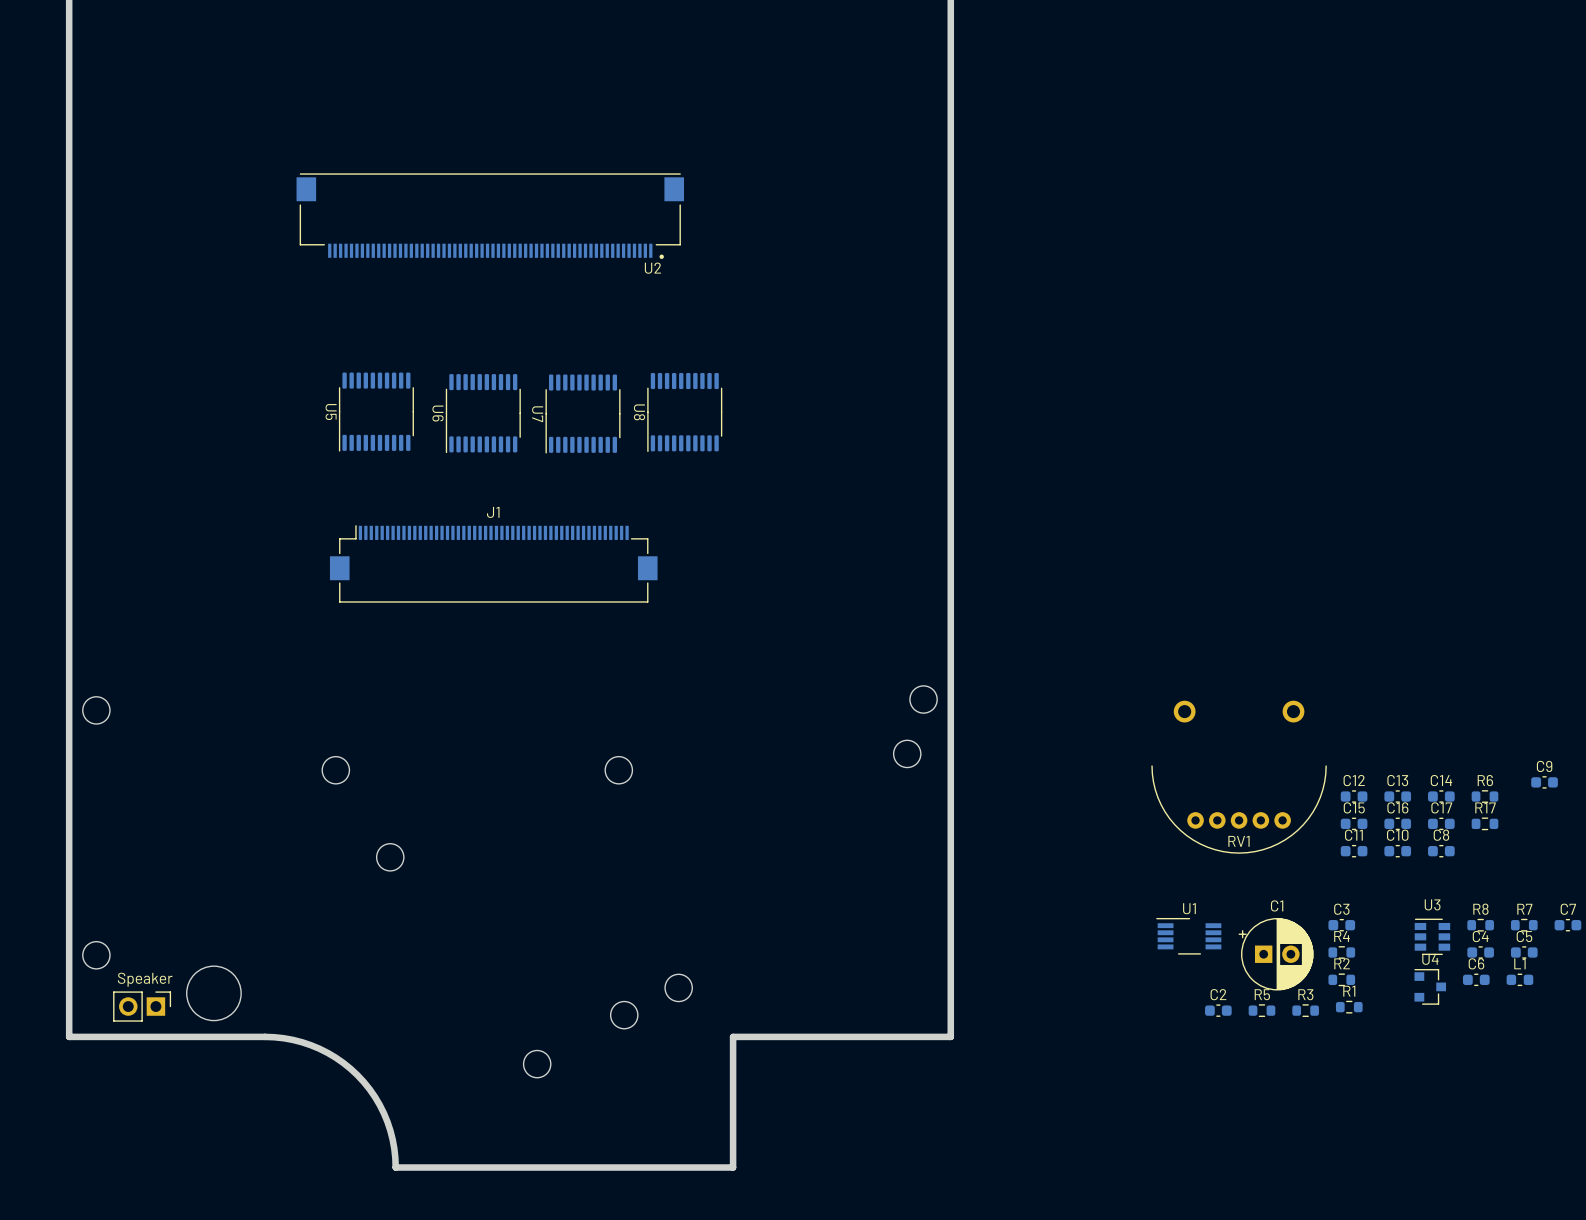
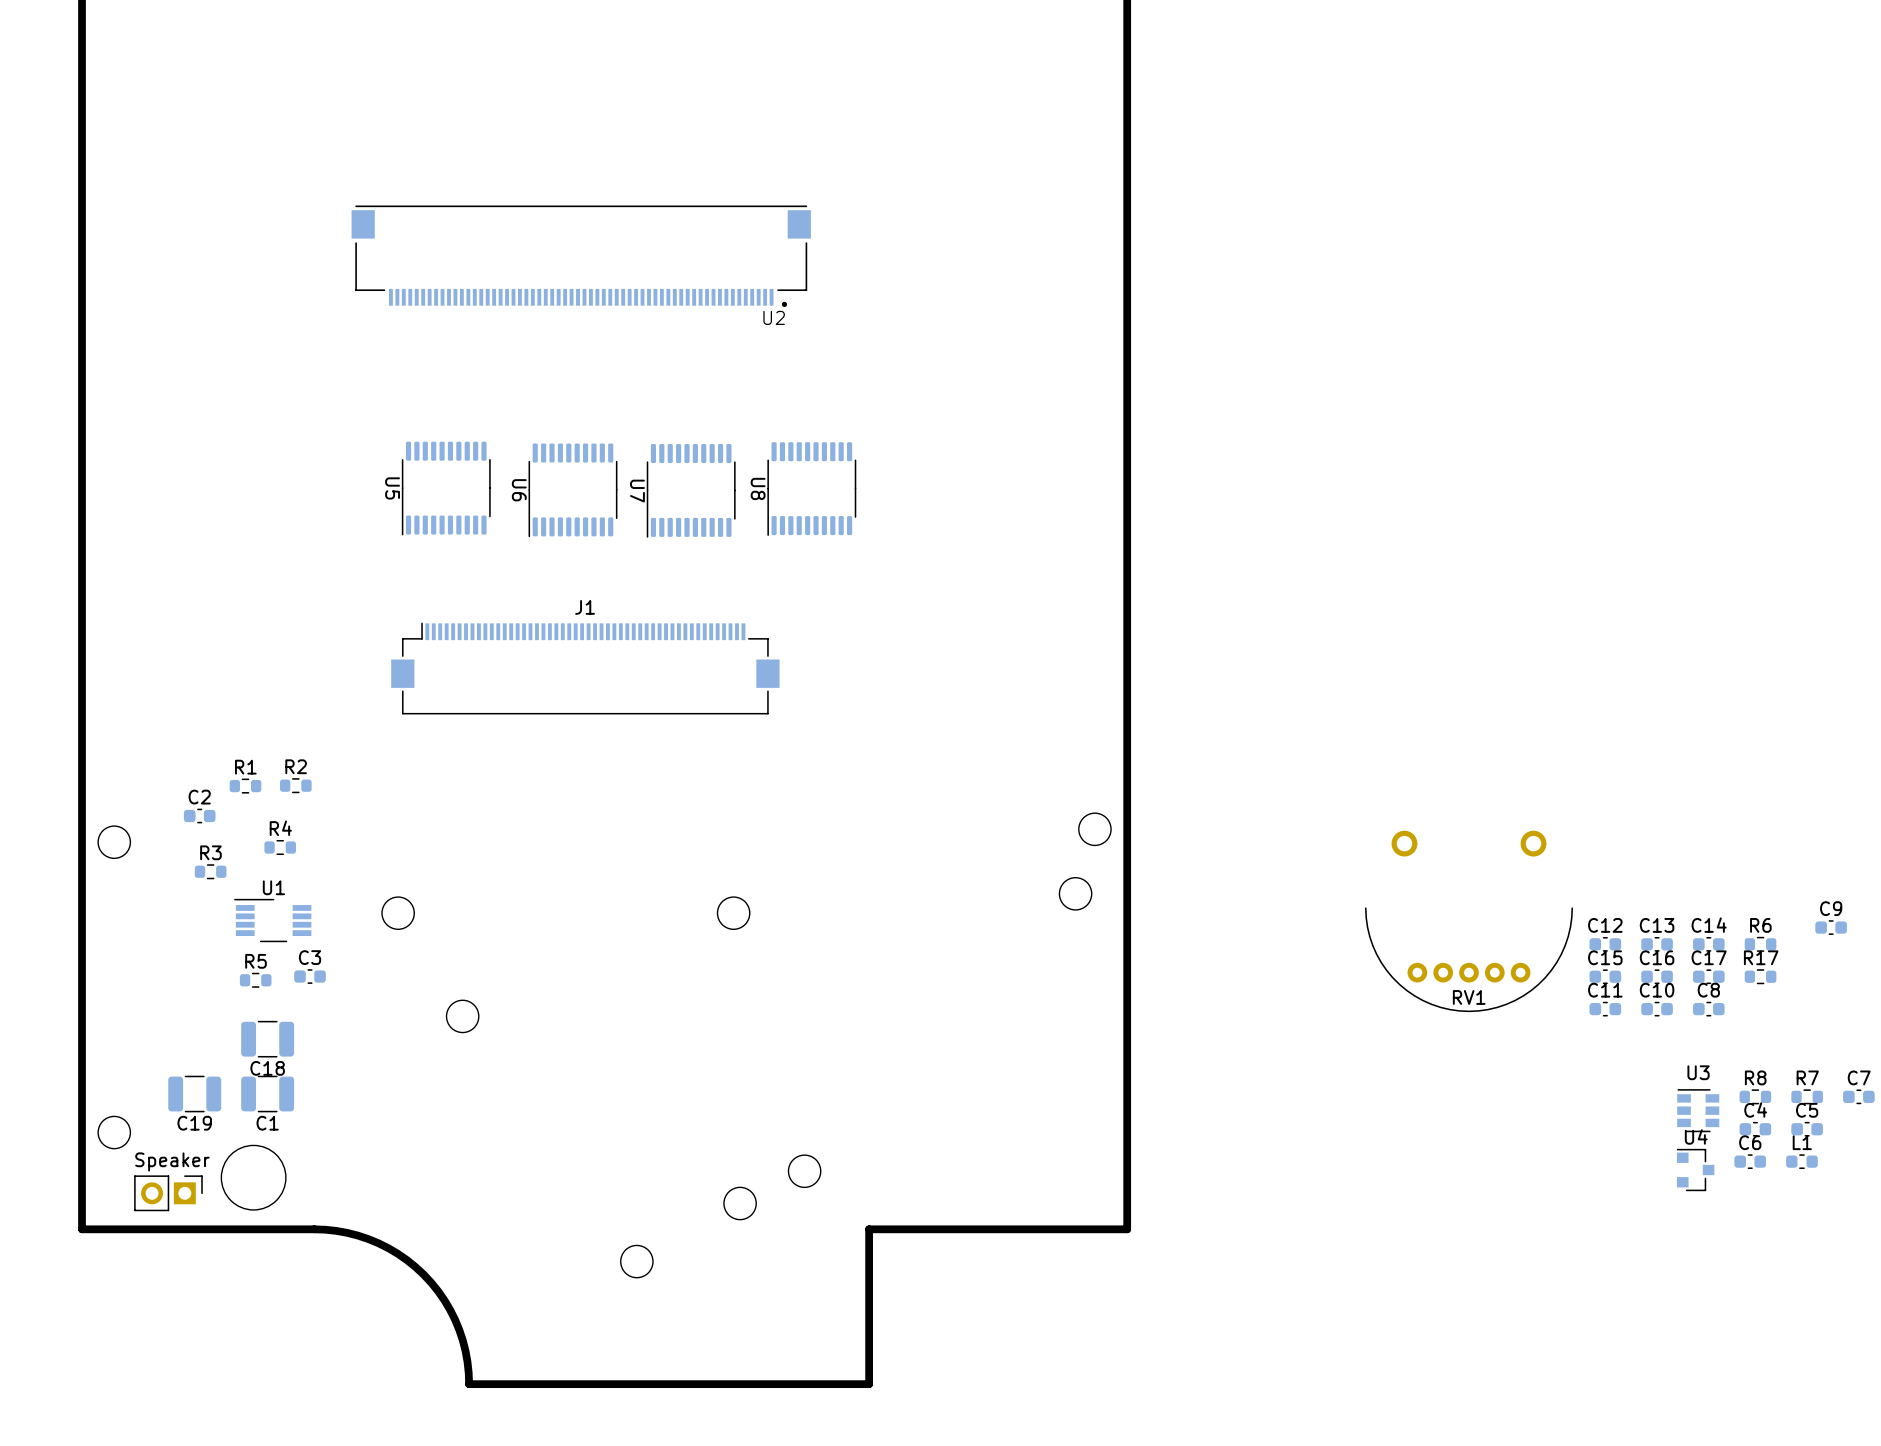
C18: none -> (267, 1039)
C1 name position: C1 (1277, 905) -> C1 (267, 1123)
C1 footprint: [1238, 918, 1314, 991] -> [241, 1075, 295, 1113]
C19: none -> (194, 1094)
C3 position: (1341, 925) -> (310, 976)
U1 position: (1188, 936) -> (272, 920)
R4 position: (1341, 952) -> (280, 847)
R2 position: (1341, 979) -> (295, 785)
R1 position: (1349, 1007) -> (245, 786)
C2 position: (1218, 1010) -> (199, 816)
R5 position: (1261, 1010) -> (255, 980)
R3 position: (1305, 1010) -> (210, 871)

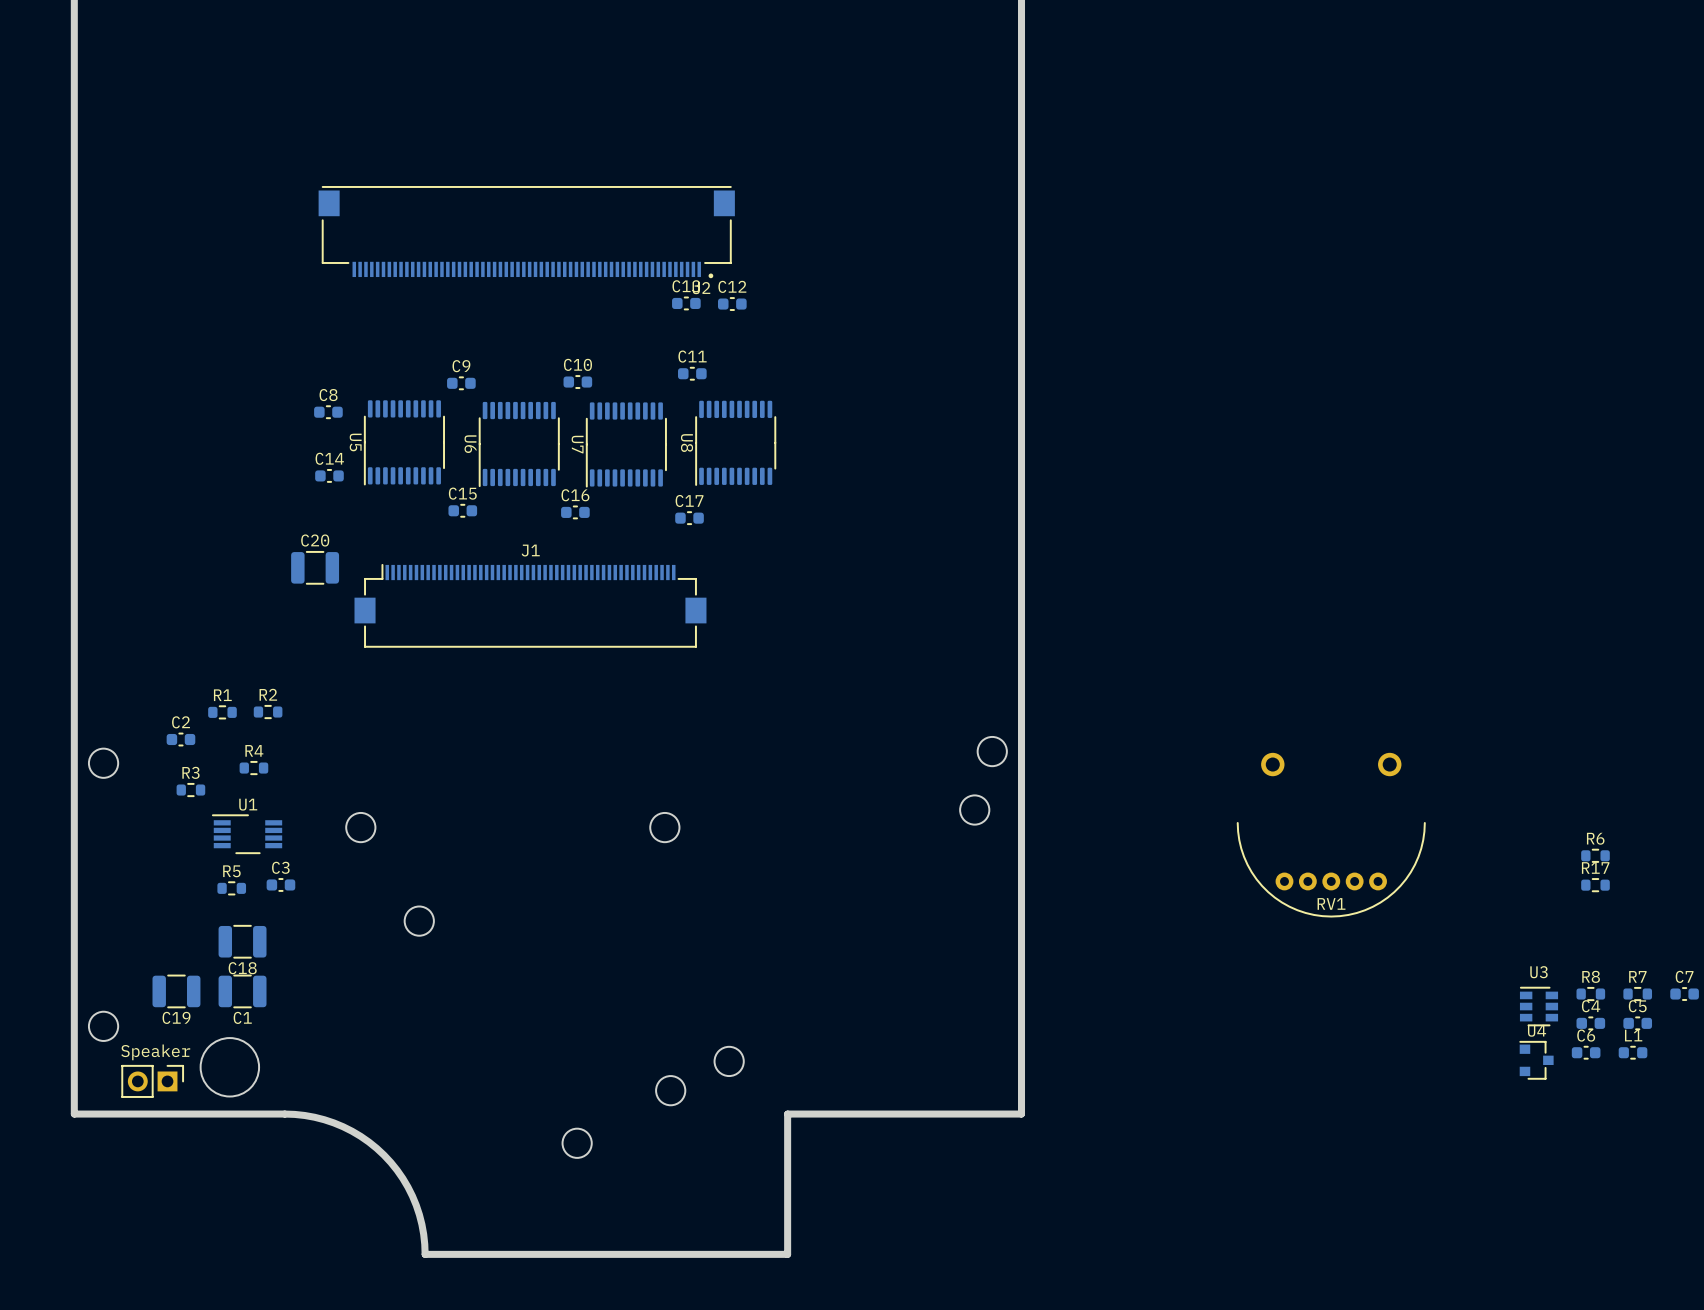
C20: none -> (315, 567)
C9 position: (1831, 927) -> (461, 383)
C12 position: (1605, 944) -> (732, 304)
C13 position: (1657, 944) -> (686, 303)
C14 position: (1708, 944) -> (329, 475)
C15 position: (1605, 976) -> (462, 510)
C16 position: (1657, 976) -> (575, 512)
C17 position: (1708, 976) -> (689, 518)
C11 position: (1605, 1009) -> (692, 373)
C10 position: (1657, 1009) -> (577, 382)
C8 position: (1708, 1009) -> (328, 412)

